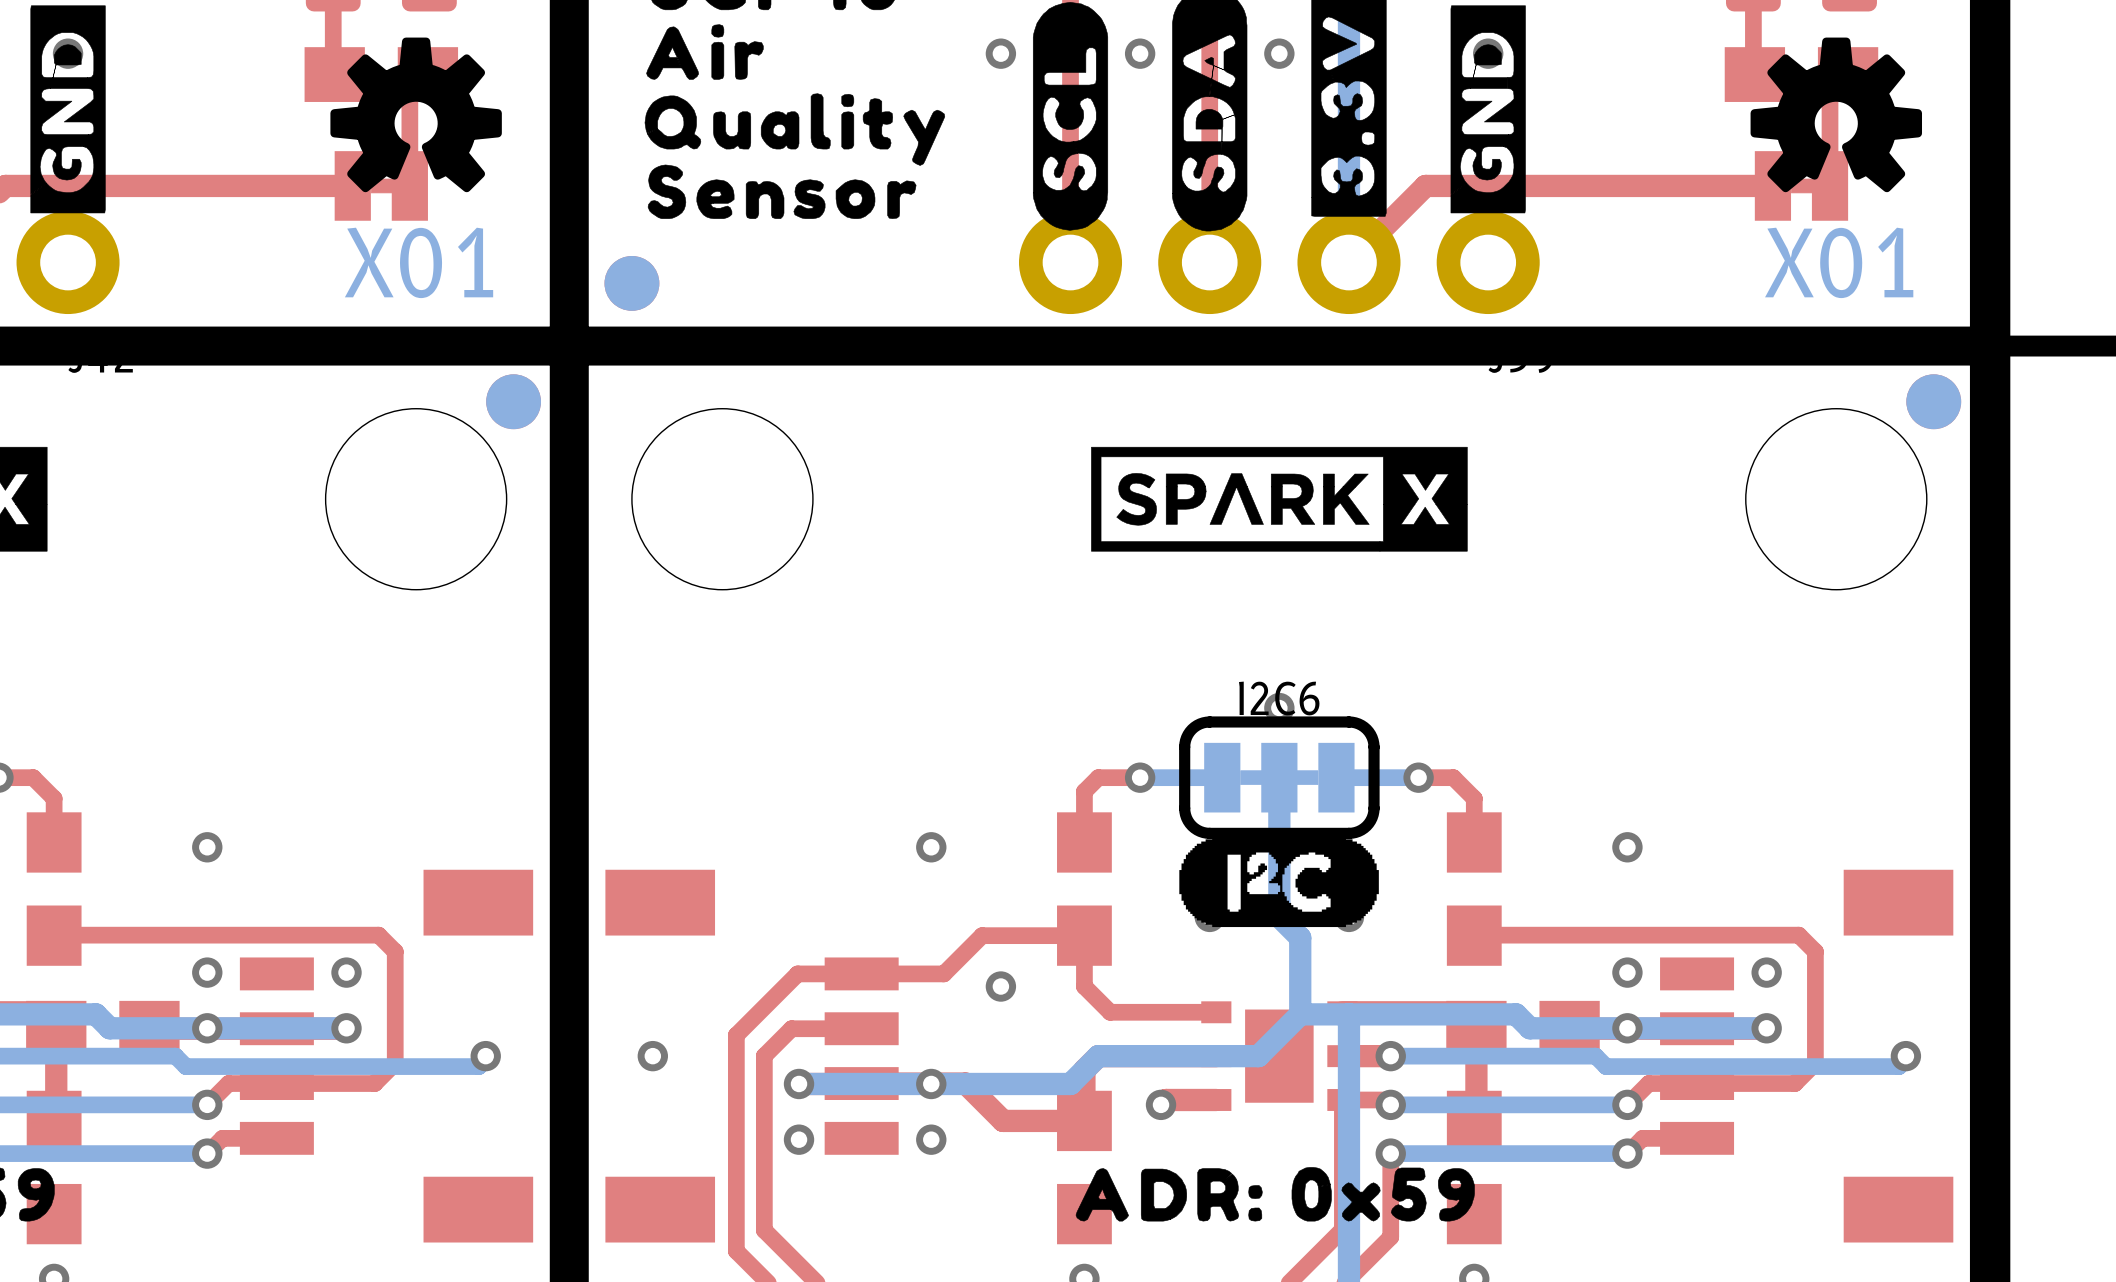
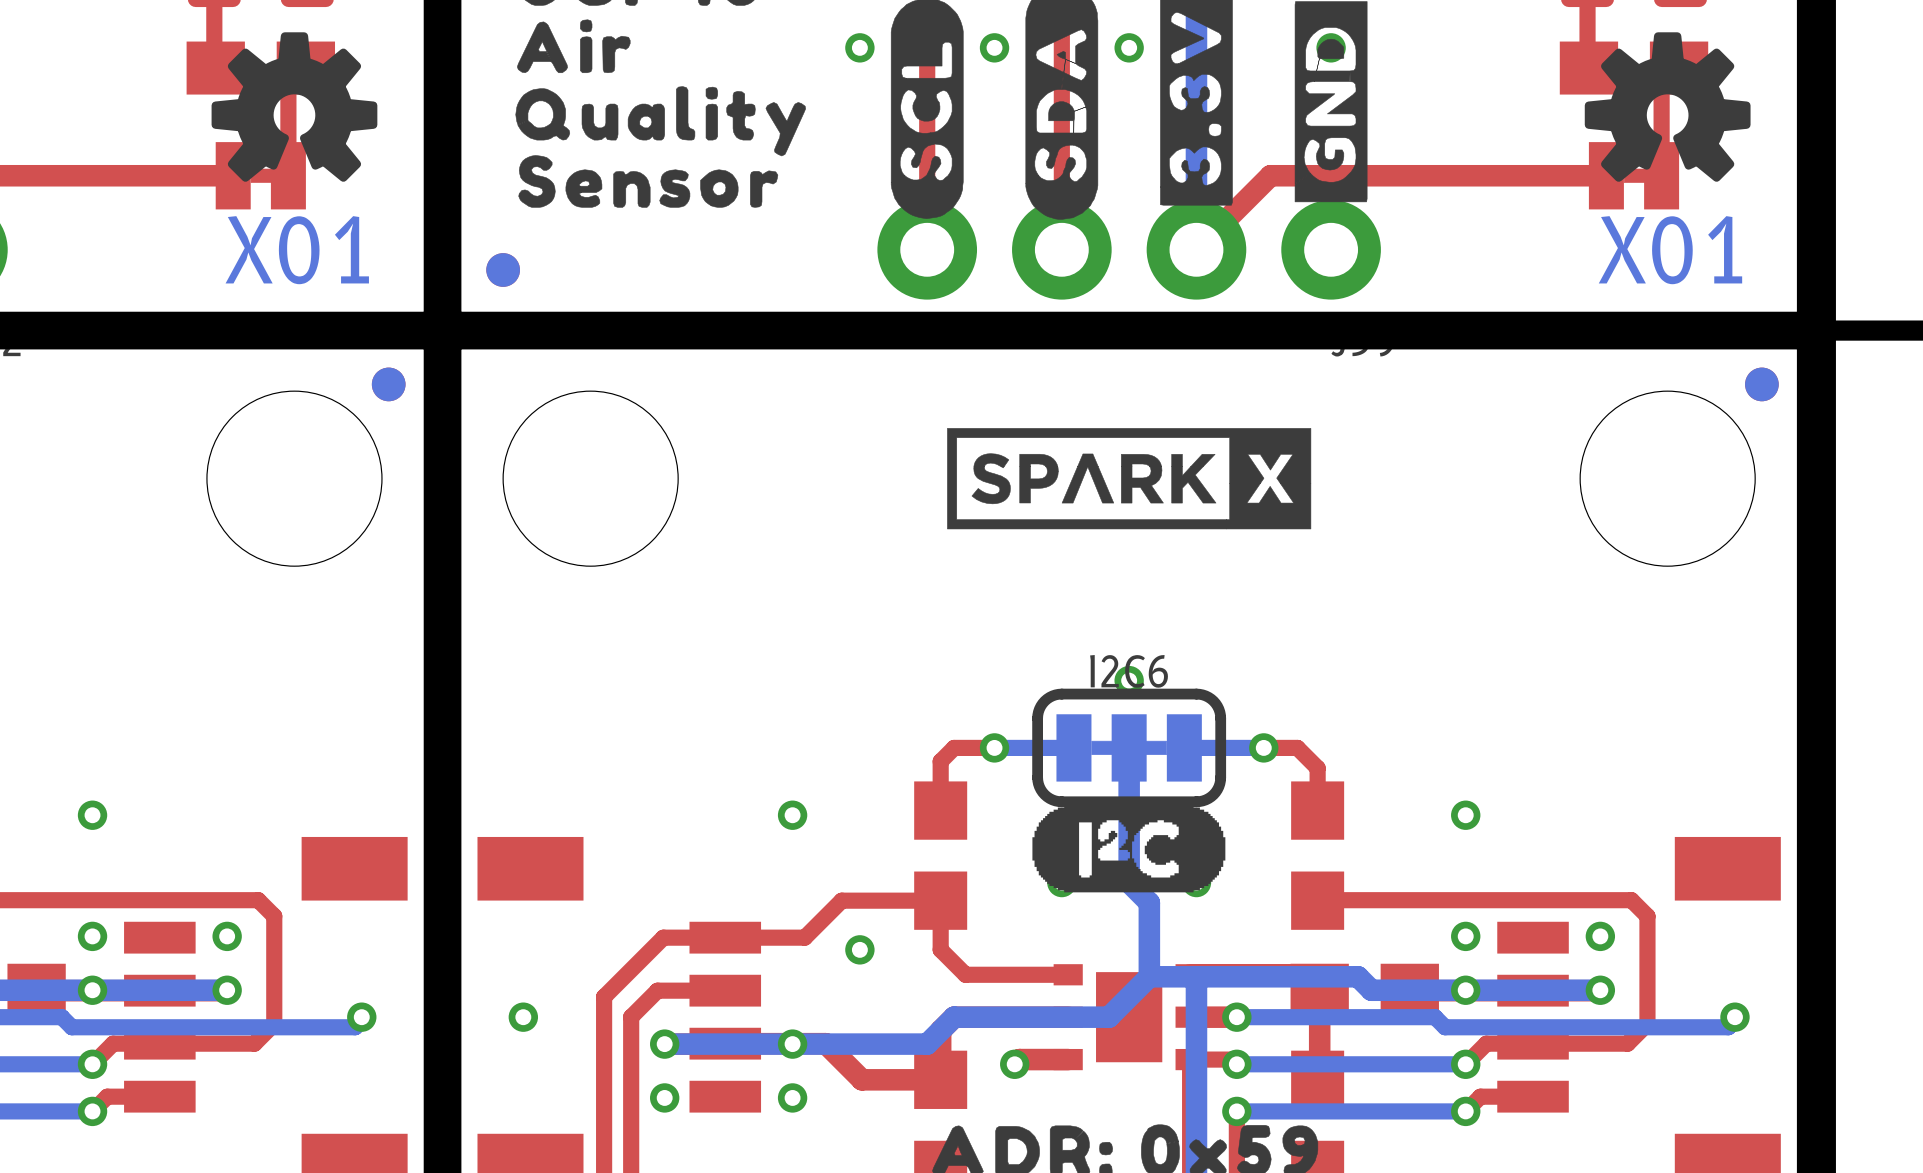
part: (631, 283) -> none
part: none -> (503, 269)
part: (513, 401) -> none
part: none -> (388, 384)
part: (1933, 401) -> none
part: none -> (1761, 384)

